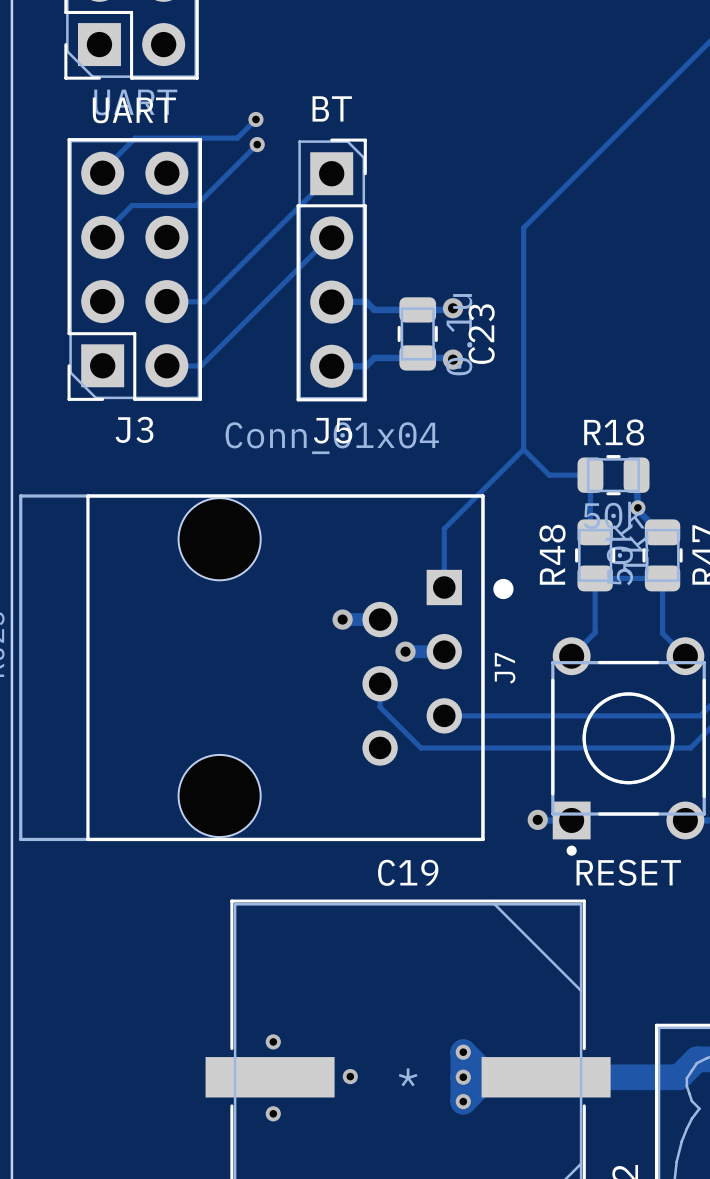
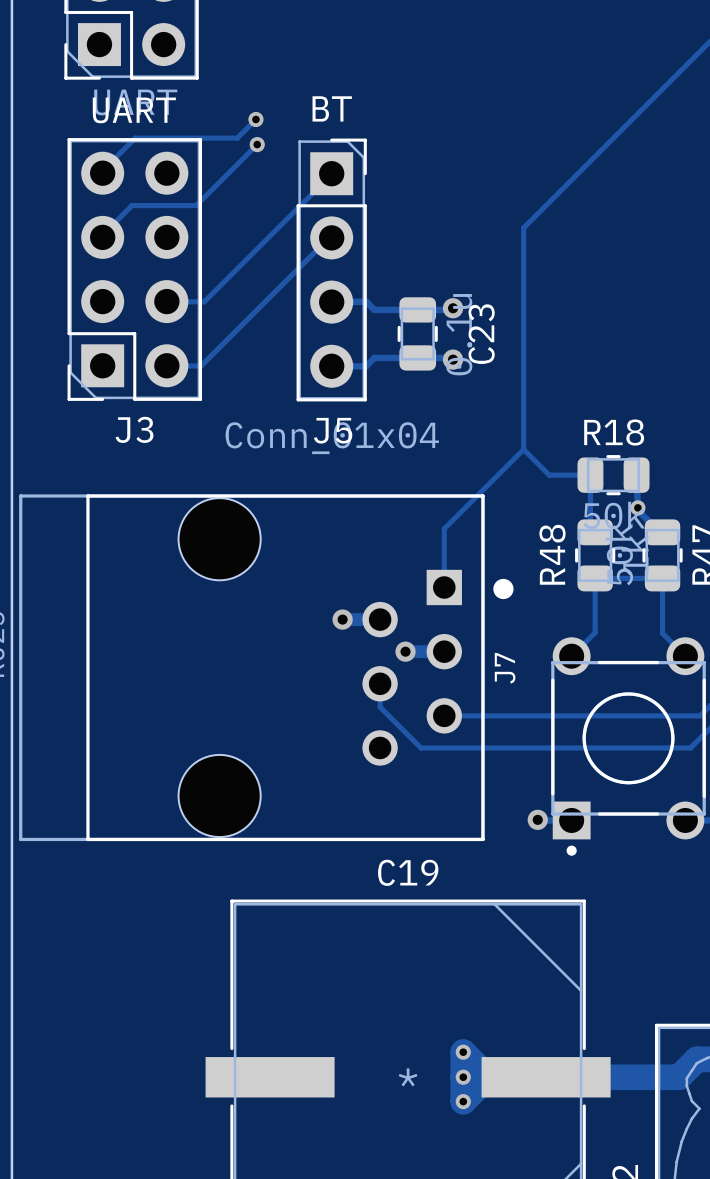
text: RESET (628, 872) -> none
via: (273, 1041) -> none
via: (350, 1076) -> none
via: (273, 1113) -> none

